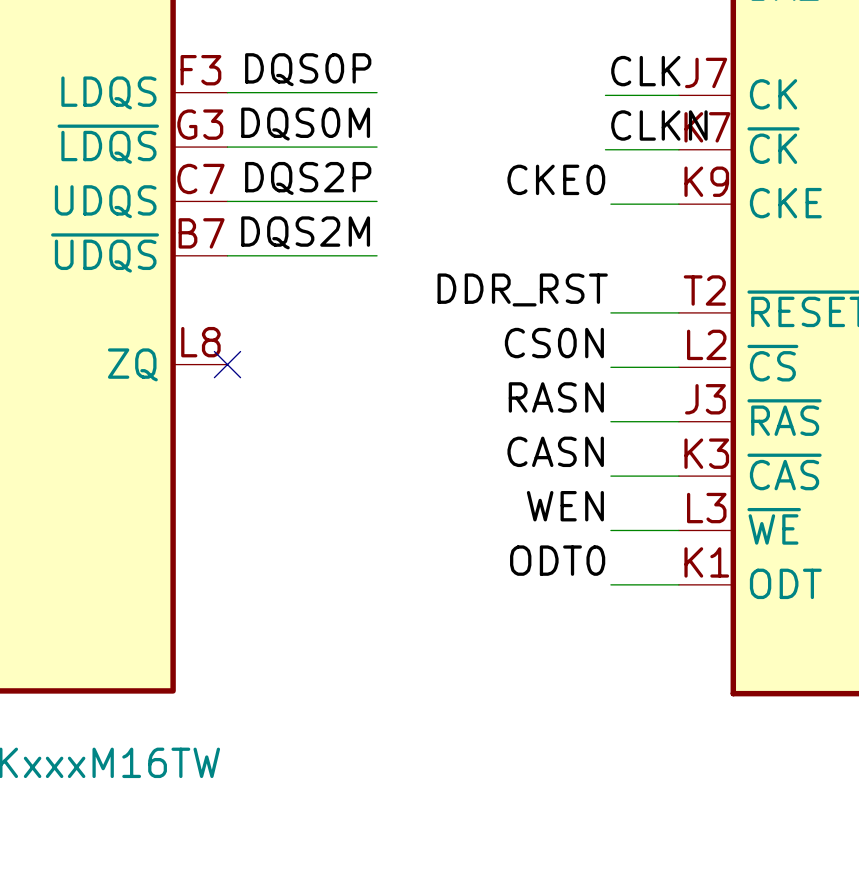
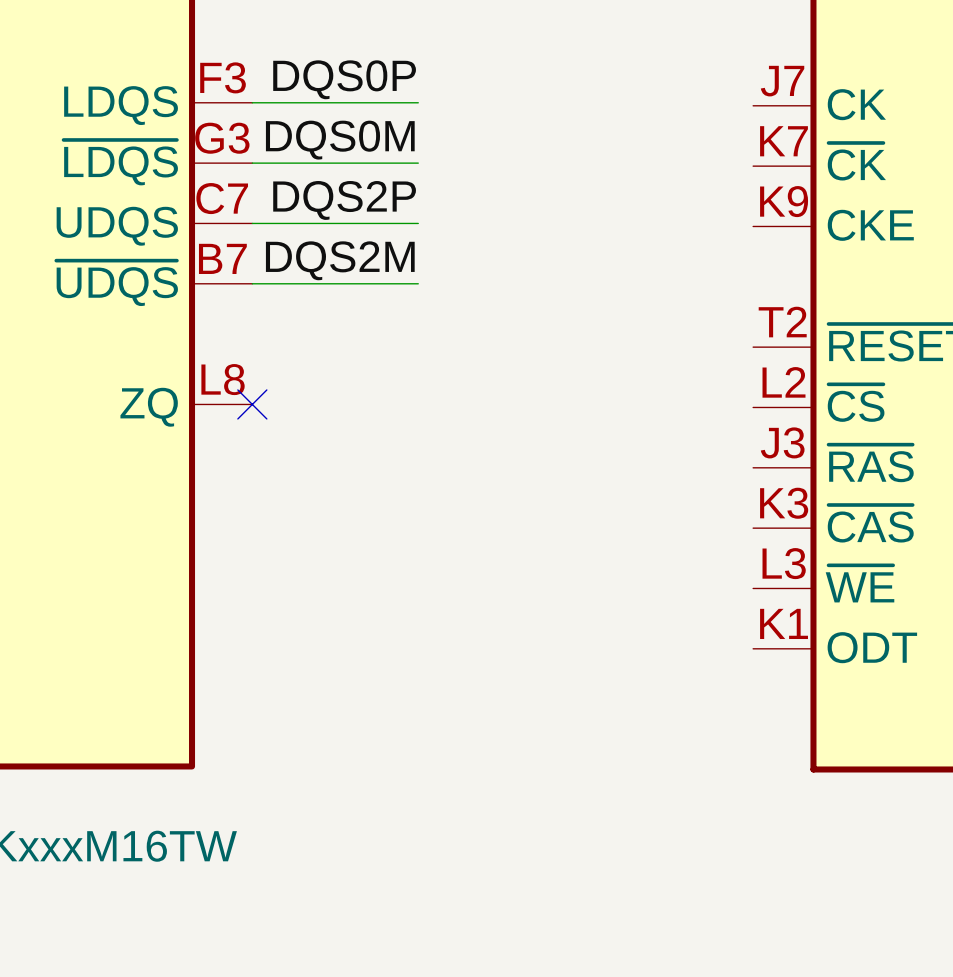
label: CLK (645, 71) -> none
wire: (605, 95) (678, 95) -> none
label: CLKN (659, 125) -> none
wire: (605, 149) (678, 149) -> none
label: CKE0 (556, 179) -> none
wire: (610, 204) (678, 204) -> none
label: DDR_RST (522, 289) -> none
wire: (610, 312) (678, 312) -> none
label: CS0N (554, 343) -> none
wire: (610, 367) (678, 367) -> none
label: RASN (556, 397) -> none
wire: (610, 421) (678, 421) -> none
label: CASN (555, 451) -> none
wire: (610, 476) (678, 476) -> none
label: WEN (565, 506) -> none
wire: (610, 530) (678, 530) -> none
label: ODT0 (557, 560) -> none
wire: (610, 584) (678, 584) -> none

